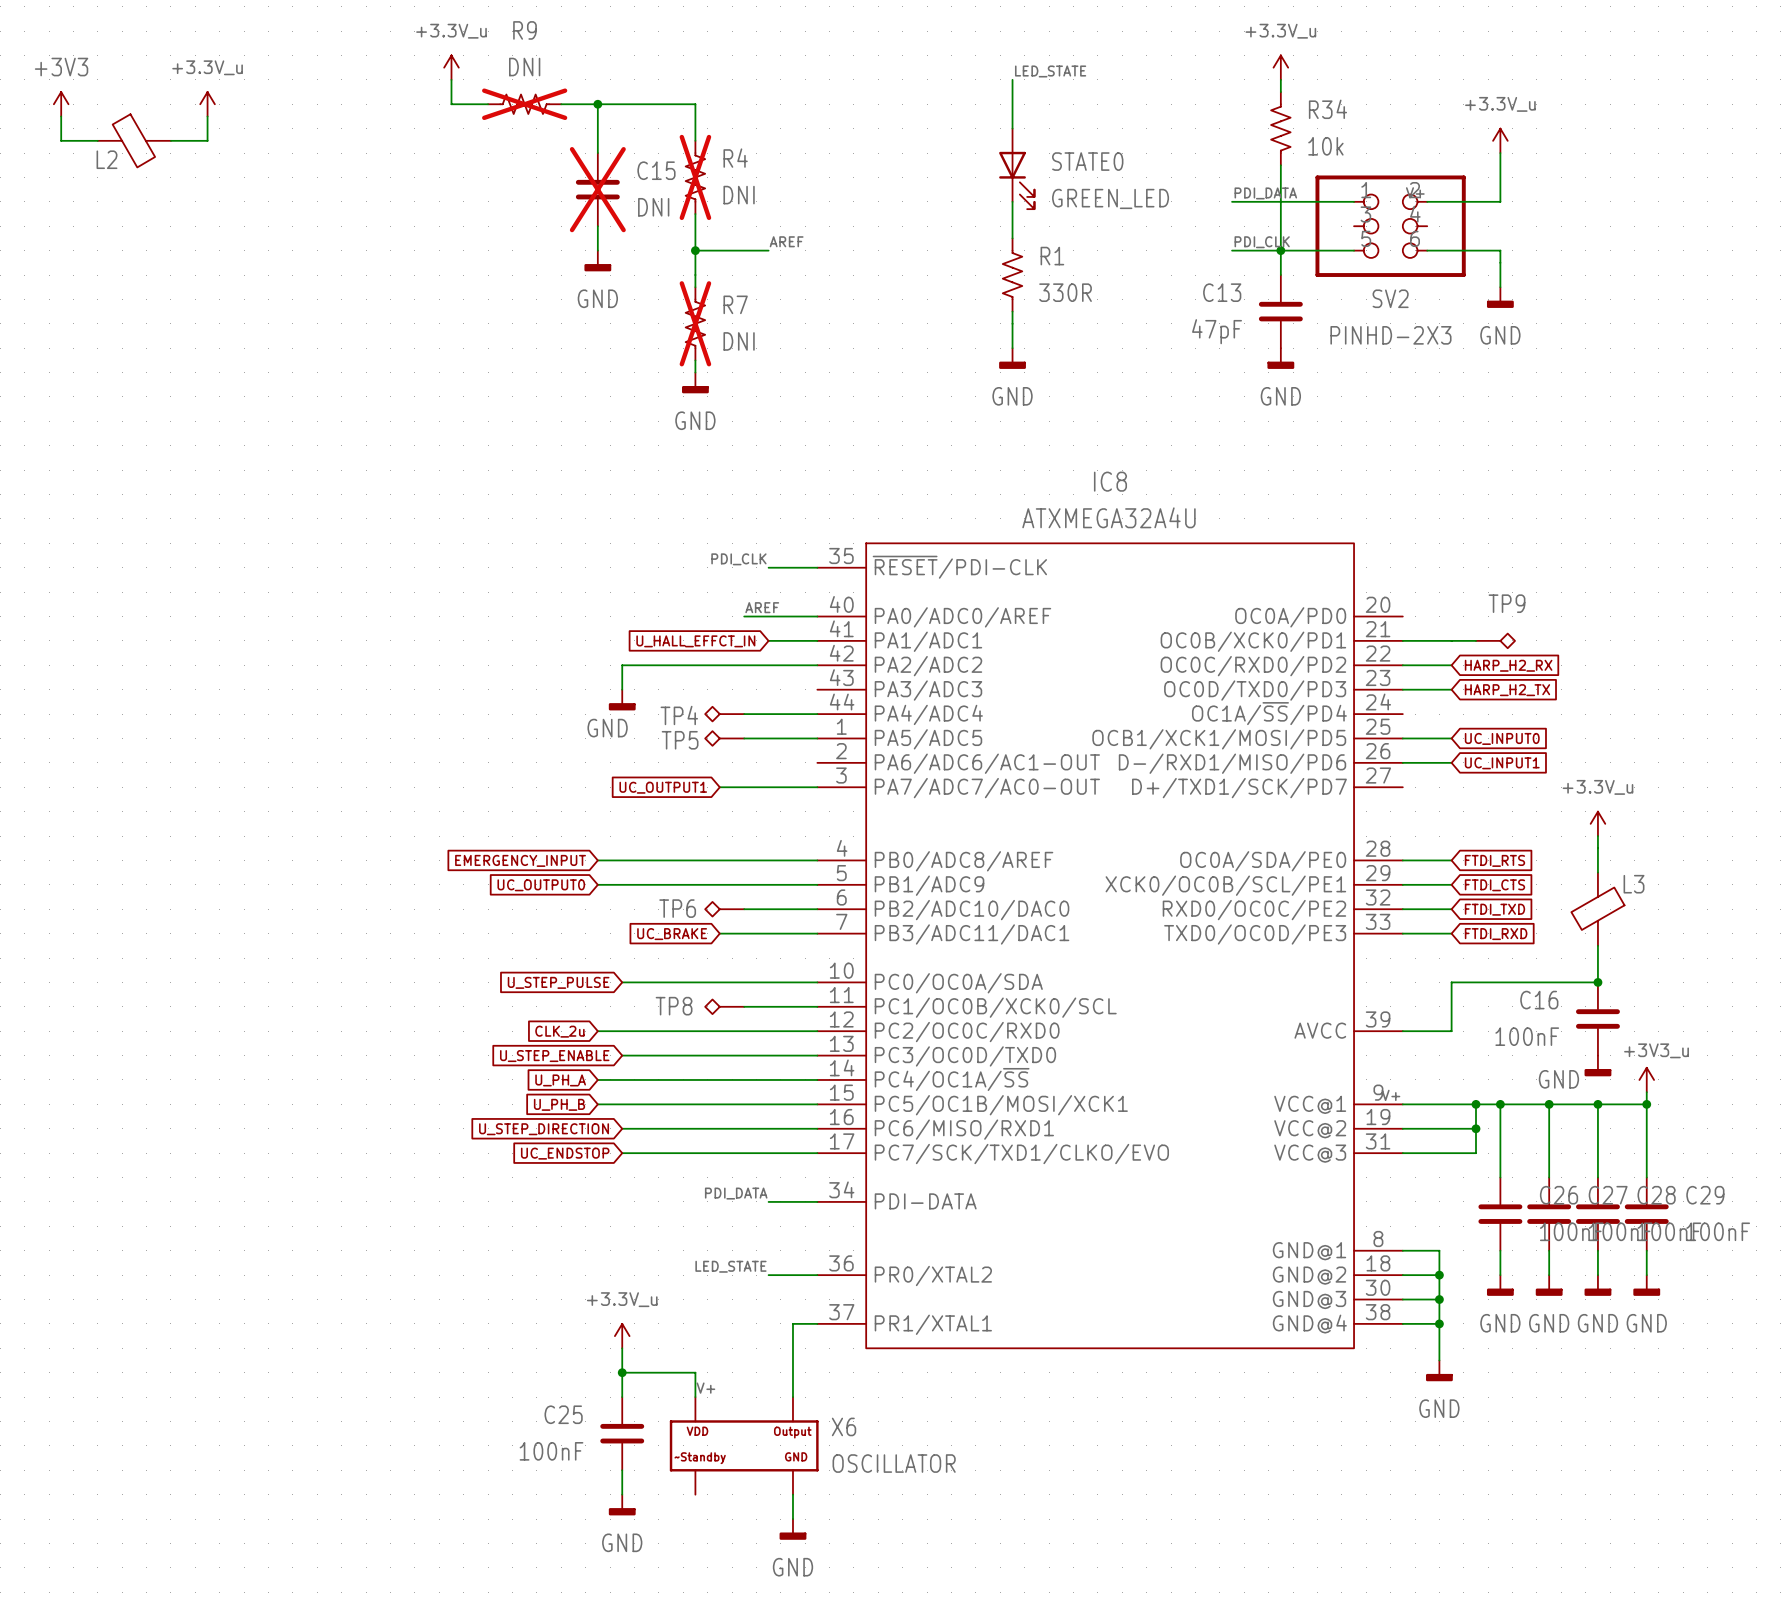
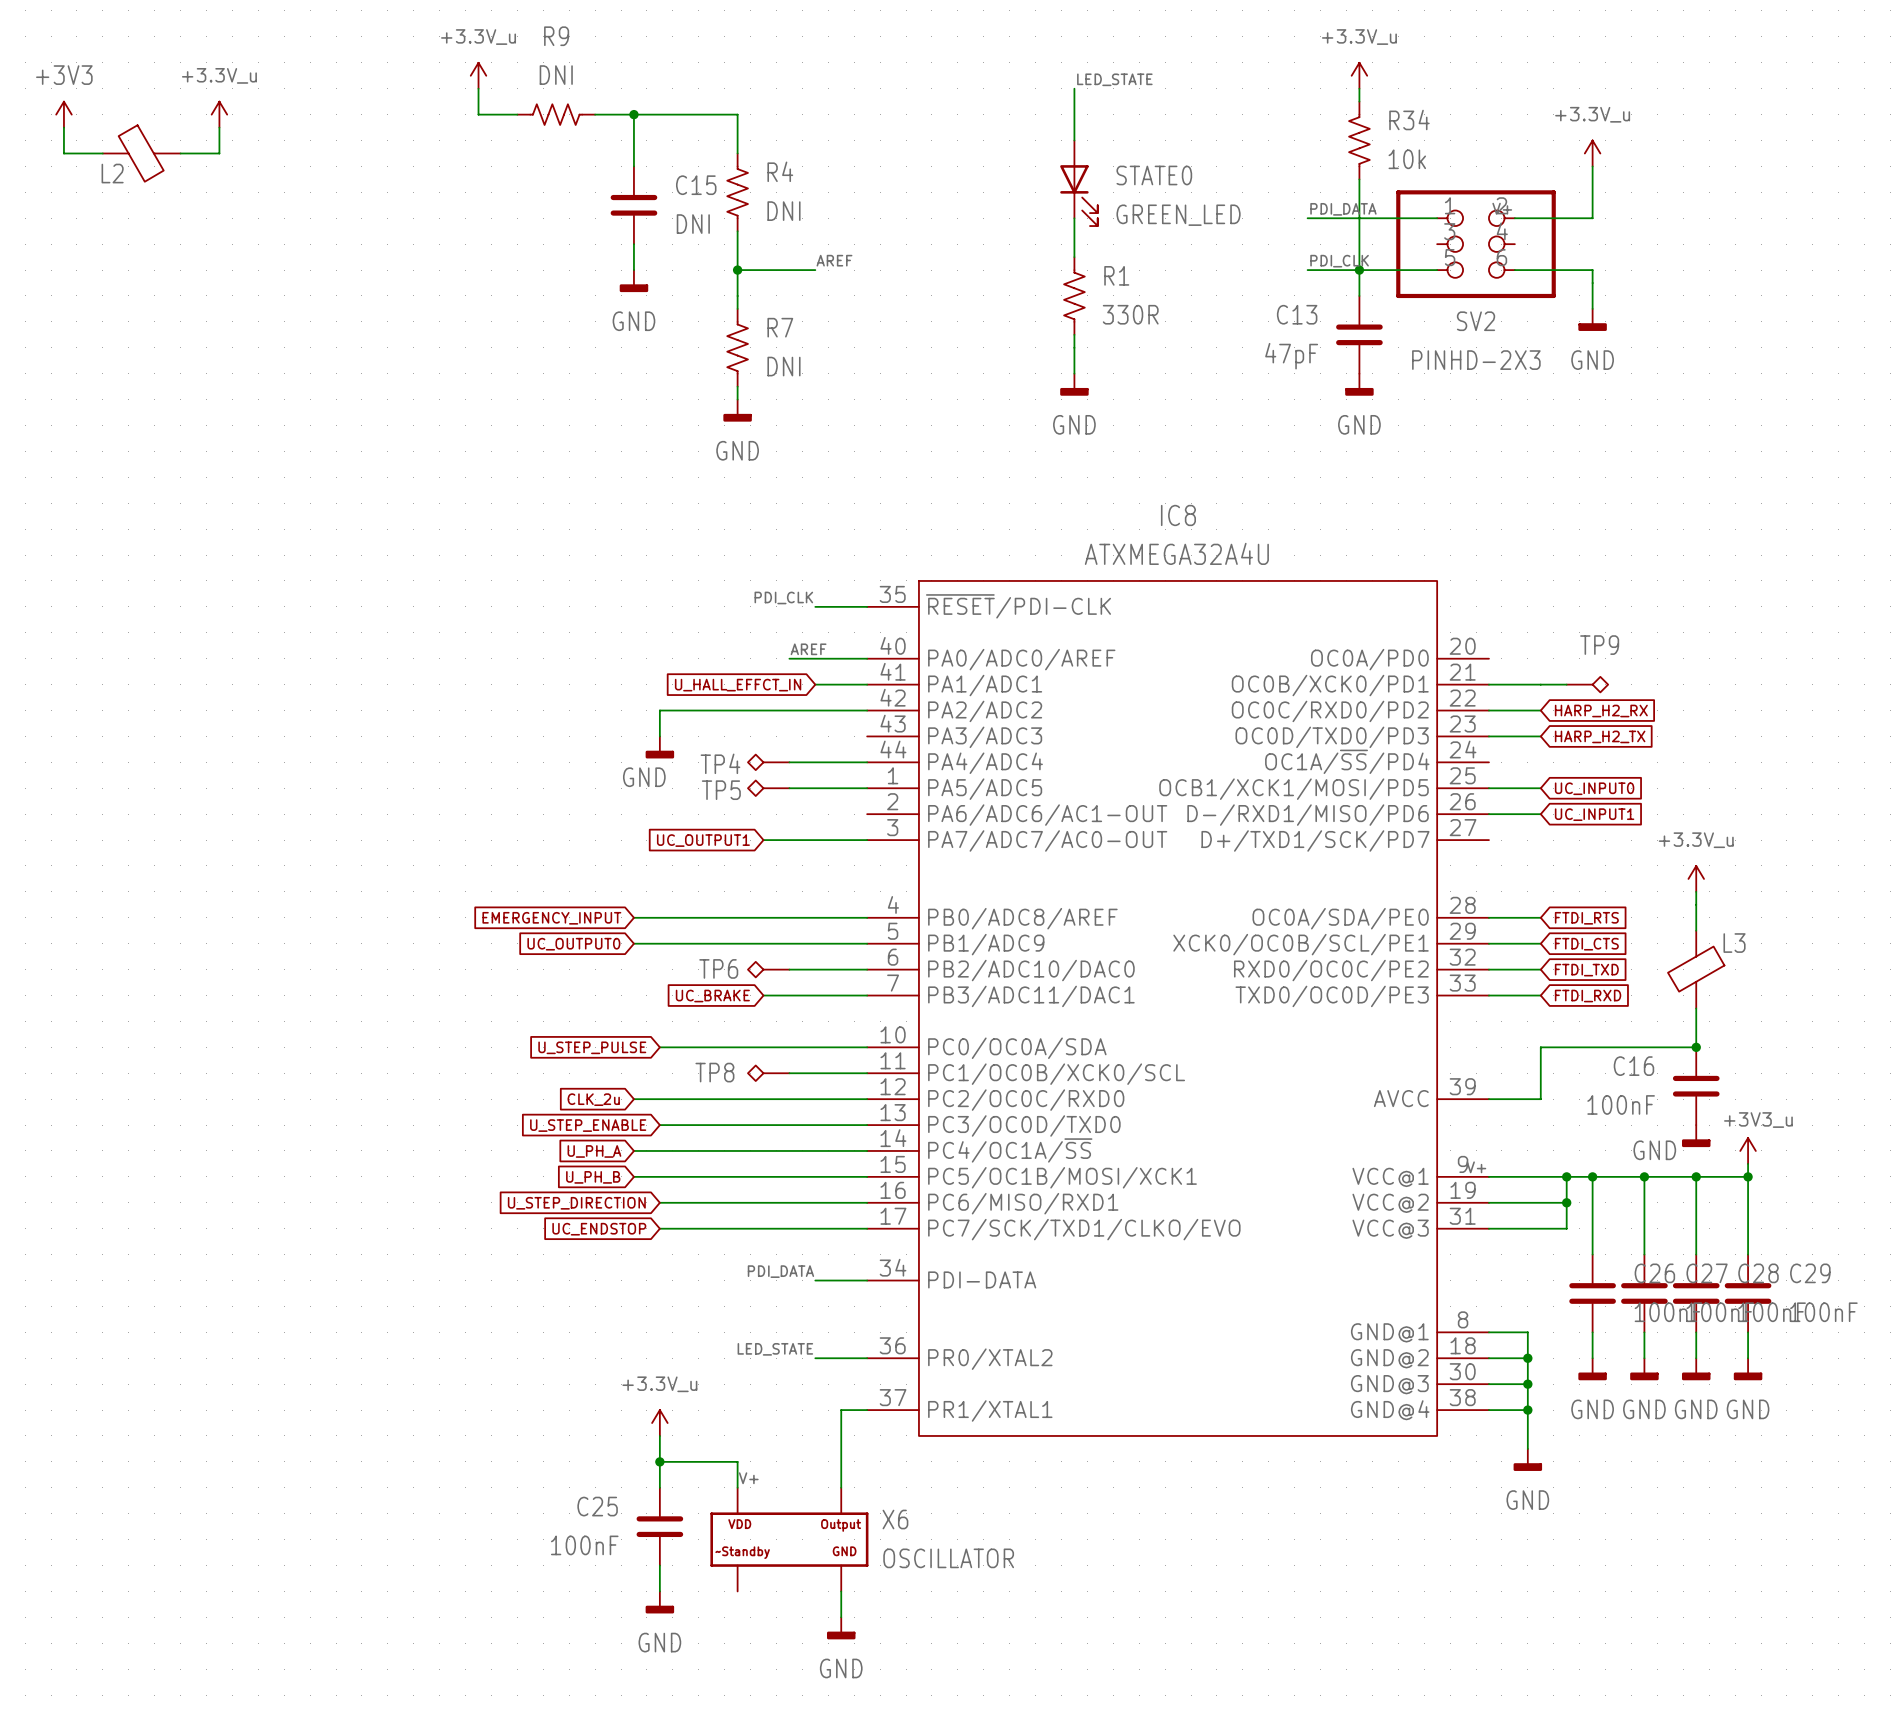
R9 do-not-place cross: (524, 104) -> none
R4 do-not-place cross: (695, 177) -> none
C15 do-not-place cross: (597, 189) -> none
R7 do-not-place cross: (695, 323) -> none

